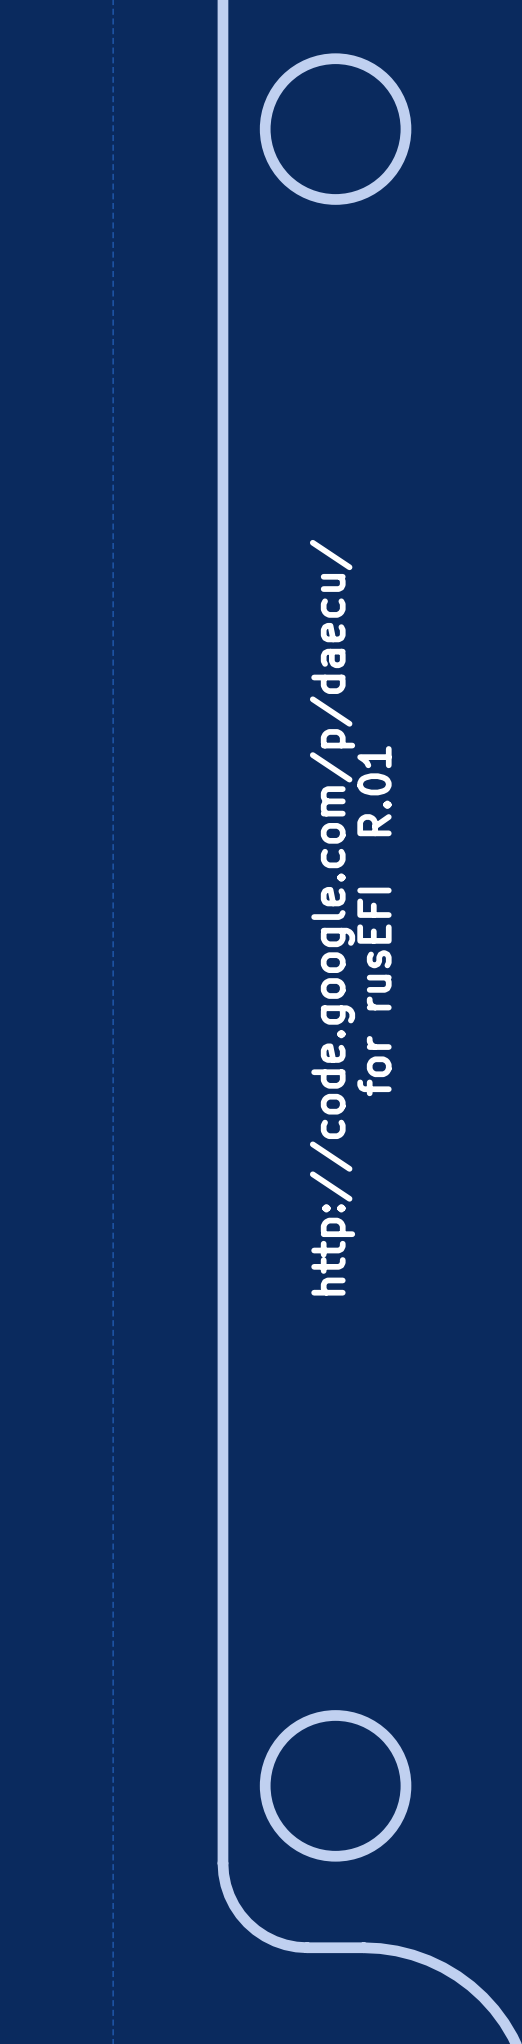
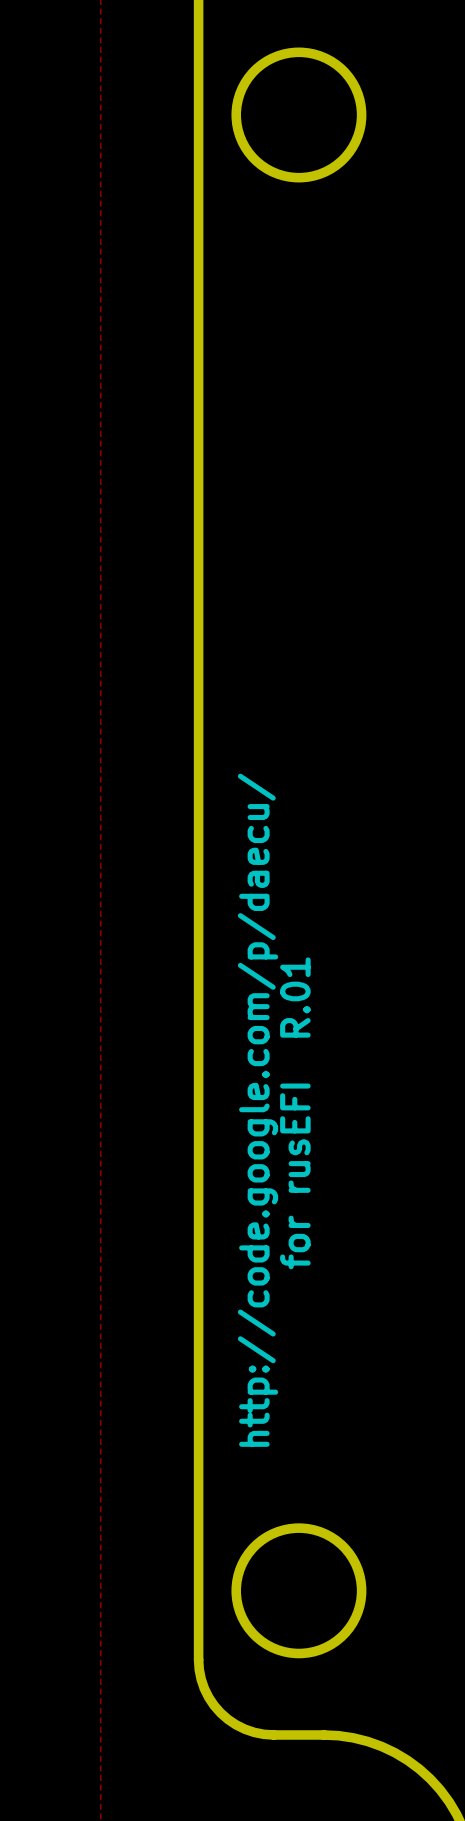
text position: http://code.google.com/p/daecu/ (332, 917) -> http://code.google.com/p/daecu/ (258, 1110)
text position: for rusEFI R.01 (374, 921) -> for rusEFI R.01 (295, 1113)

